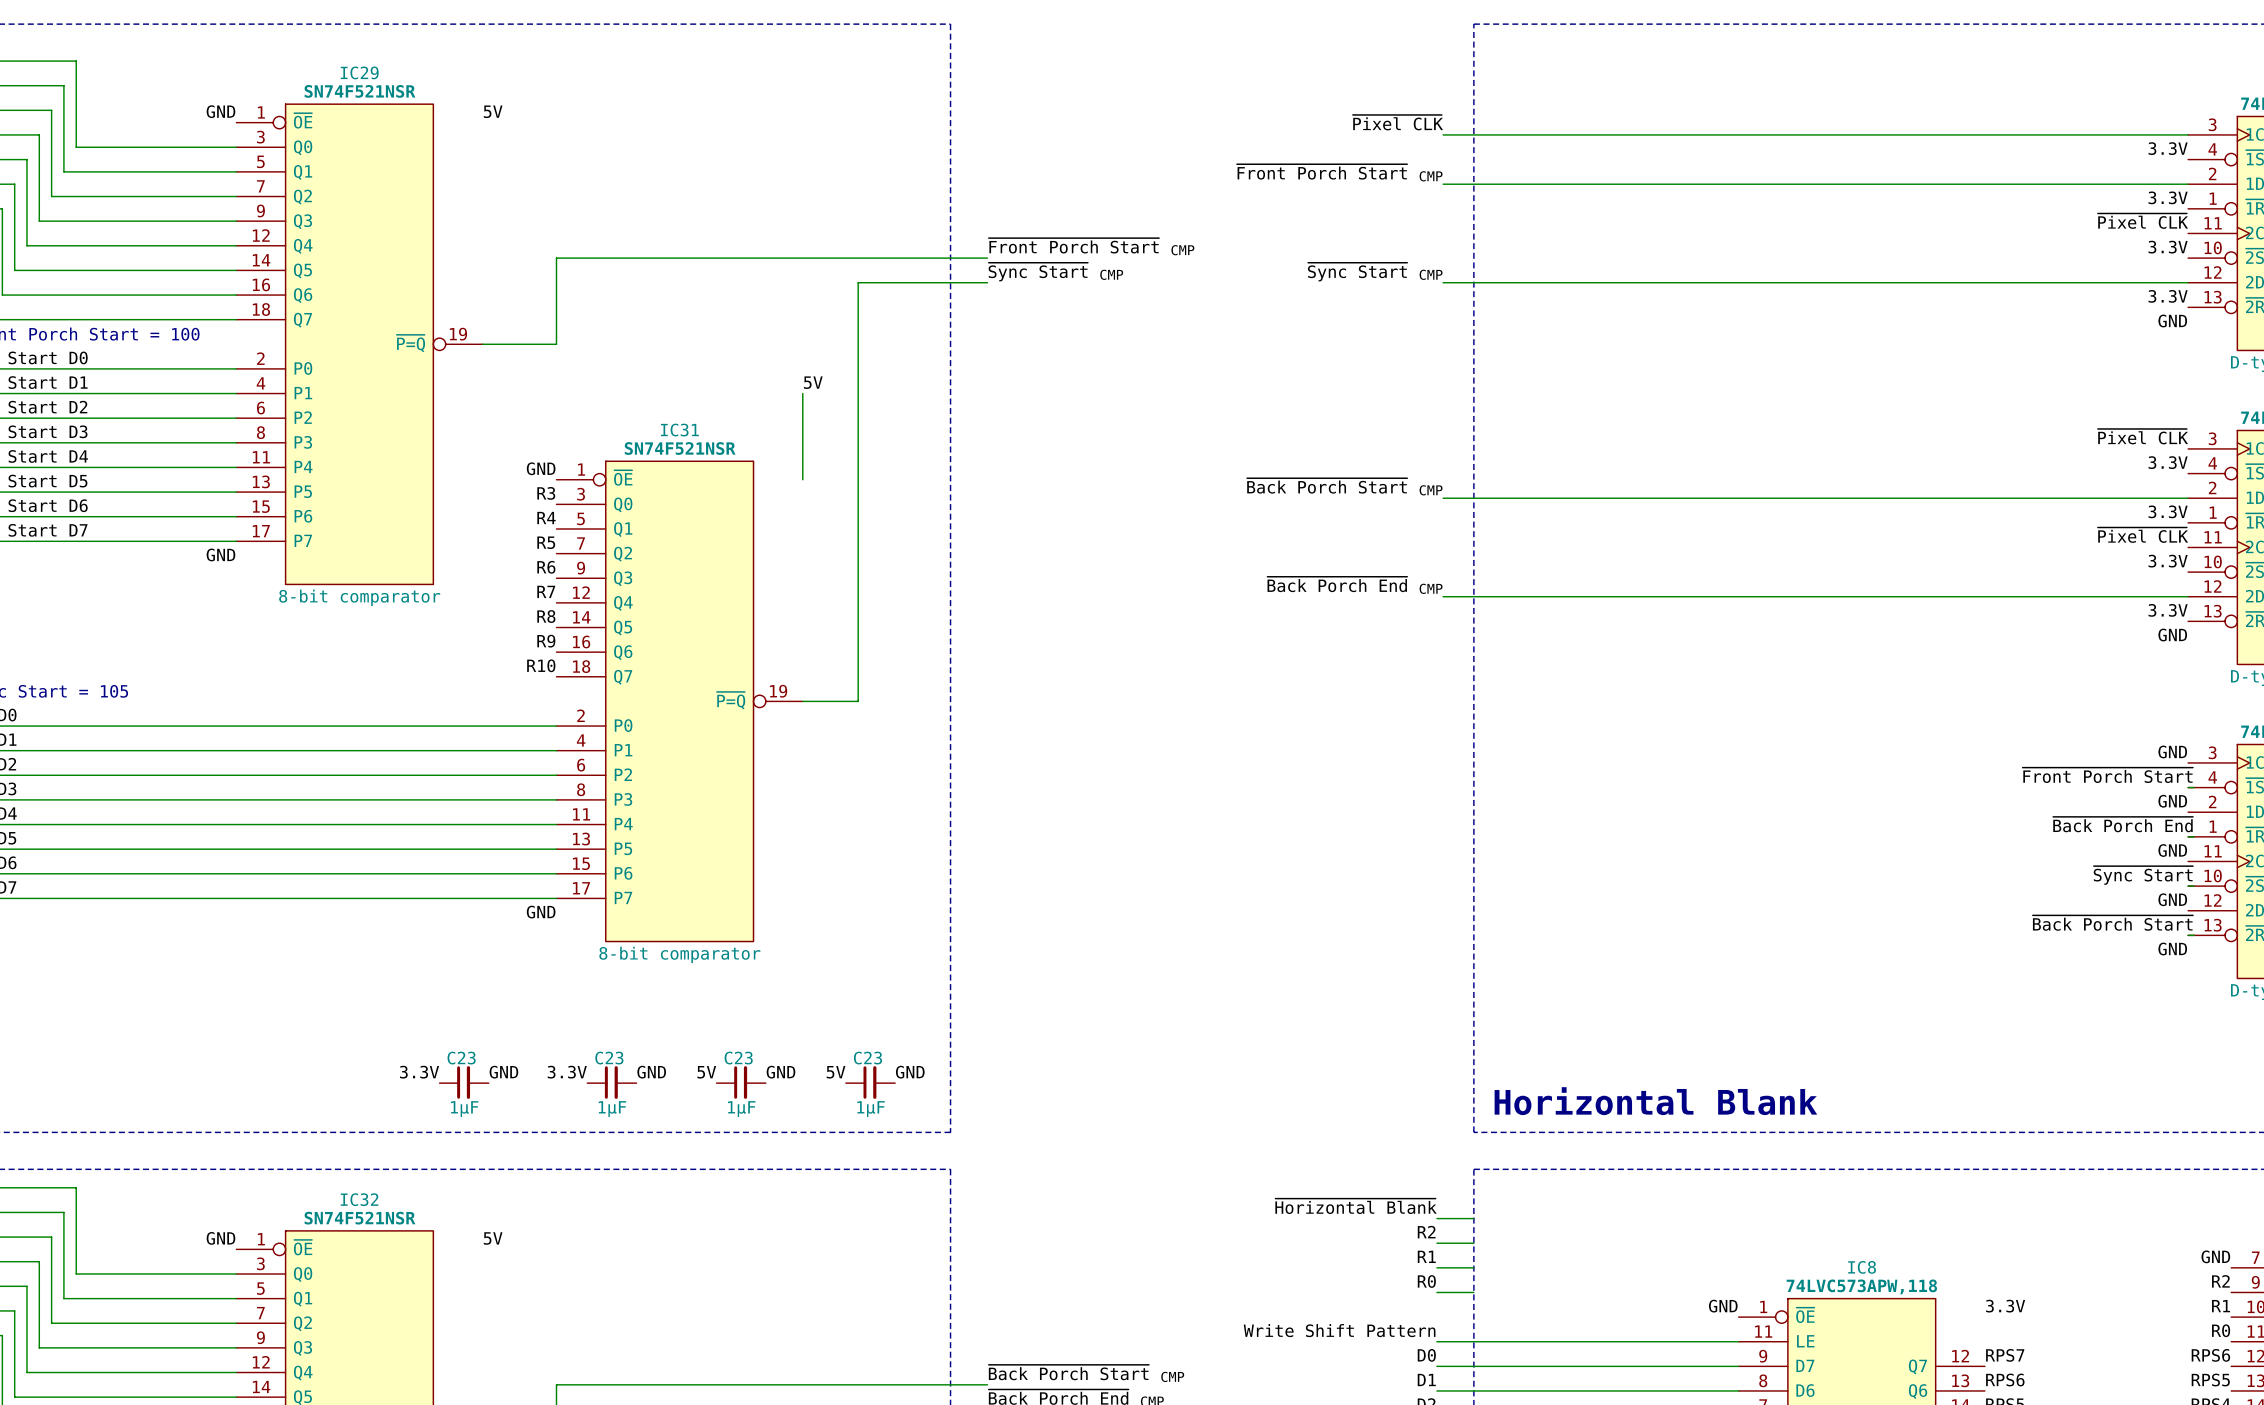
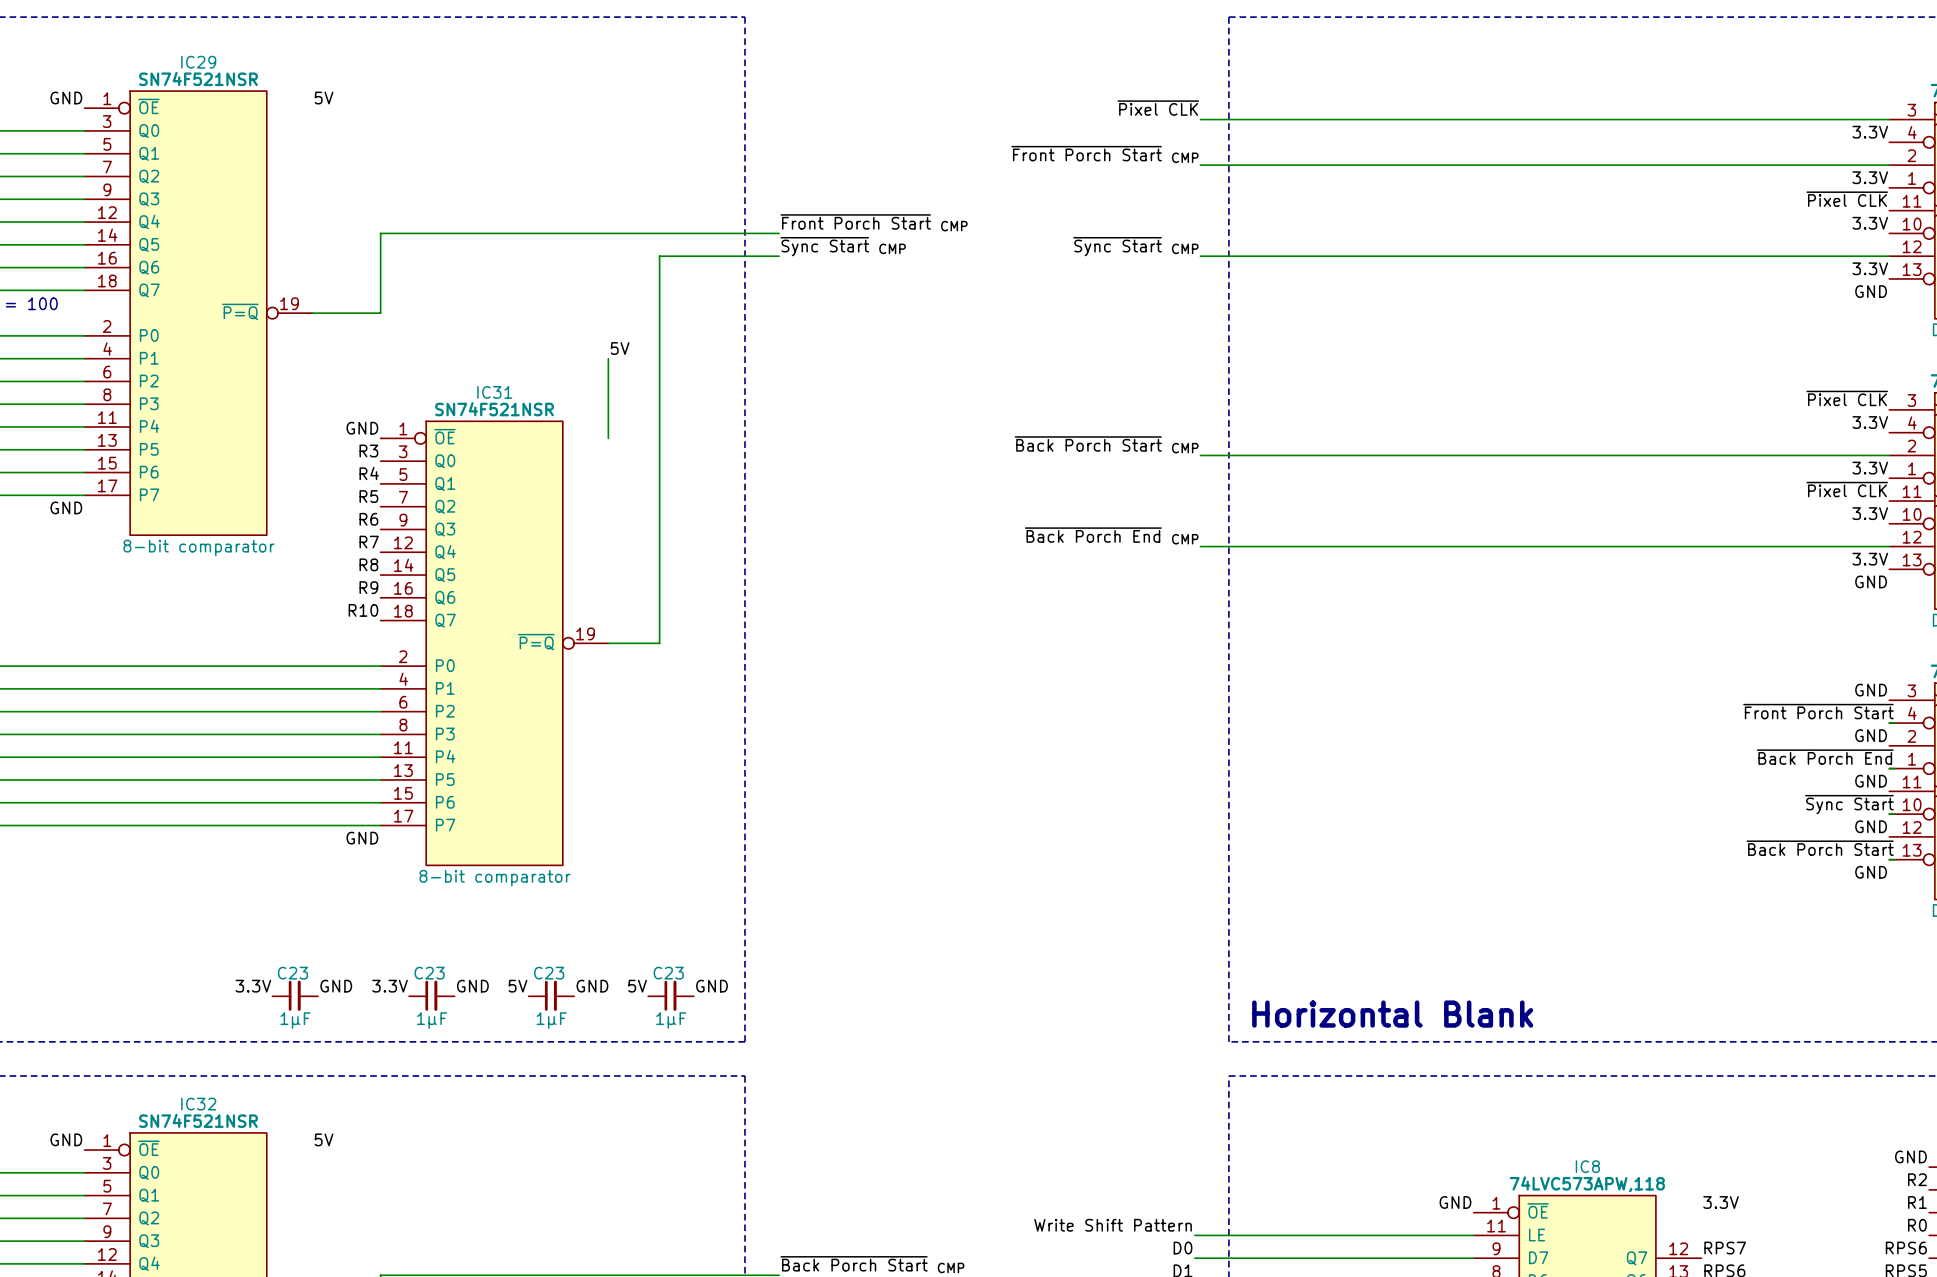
label: ~{Horizontal Blank} (1356, 1206) -> none
wire: (1436, 1218) (1473, 1218) -> none
label: R2 (1426, 1232) -> none
wire: (1436, 1243) (1473, 1243) -> none
label: R1 (1426, 1256) -> none
wire: (1436, 1267) (1473, 1267) -> none
label: R0 (1426, 1281) -> none
wire: (1436, 1292) (1473, 1292) -> none

